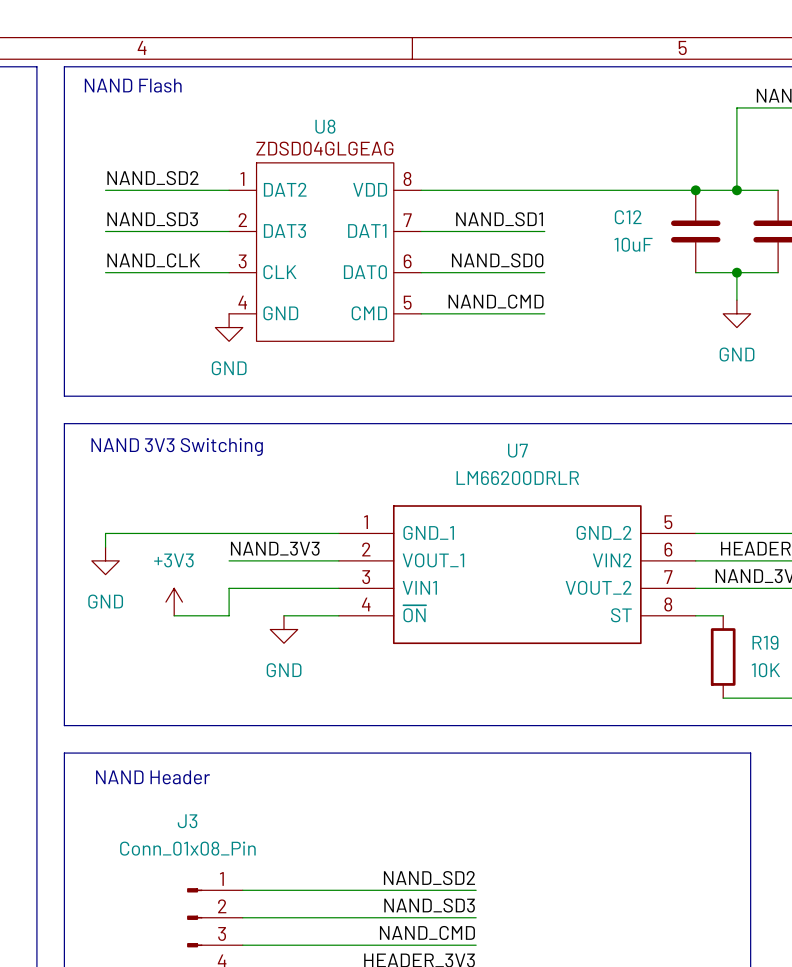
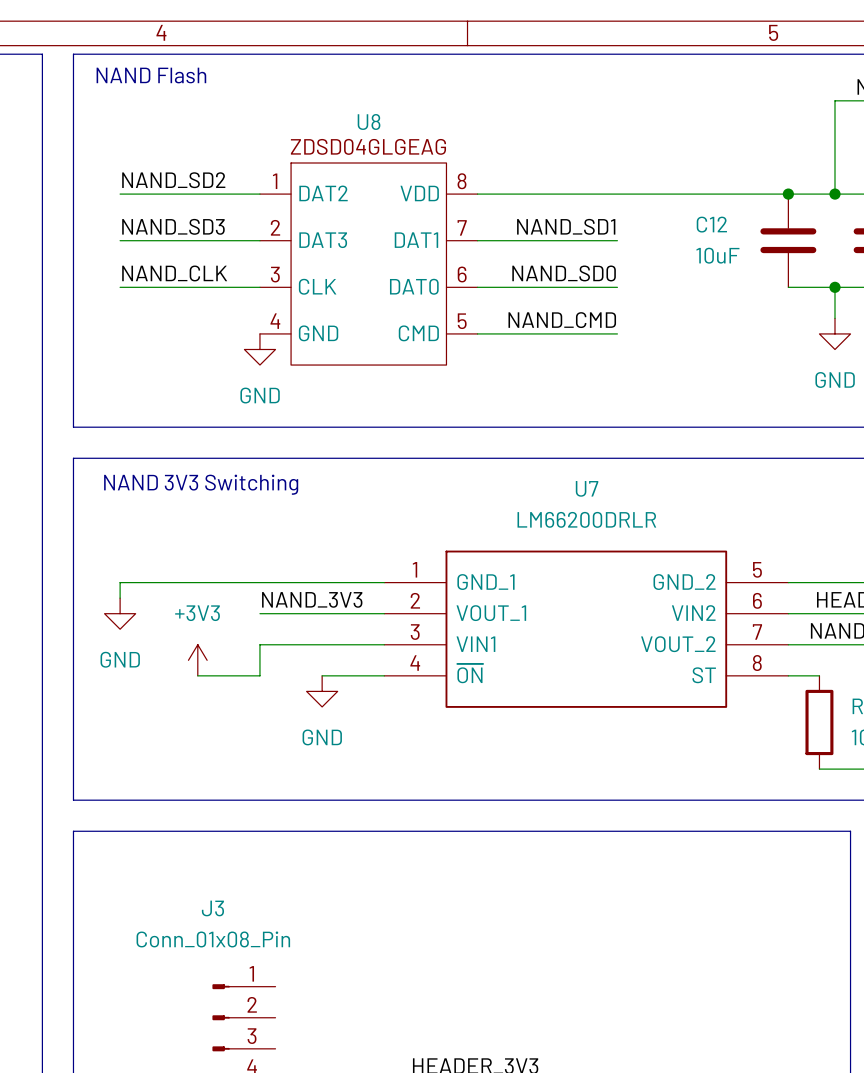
text: NAND Header (153, 777) -> none
label: NAND_SD2 (429, 878) -> none
wire: (242, 890) (476, 890) -> none
label: NAND_SD3 (429, 905) -> none
wire: (242, 917) (476, 917) -> none
label: NAND_CMD (427, 932) -> none
wire: (242, 945) (476, 945) -> none

